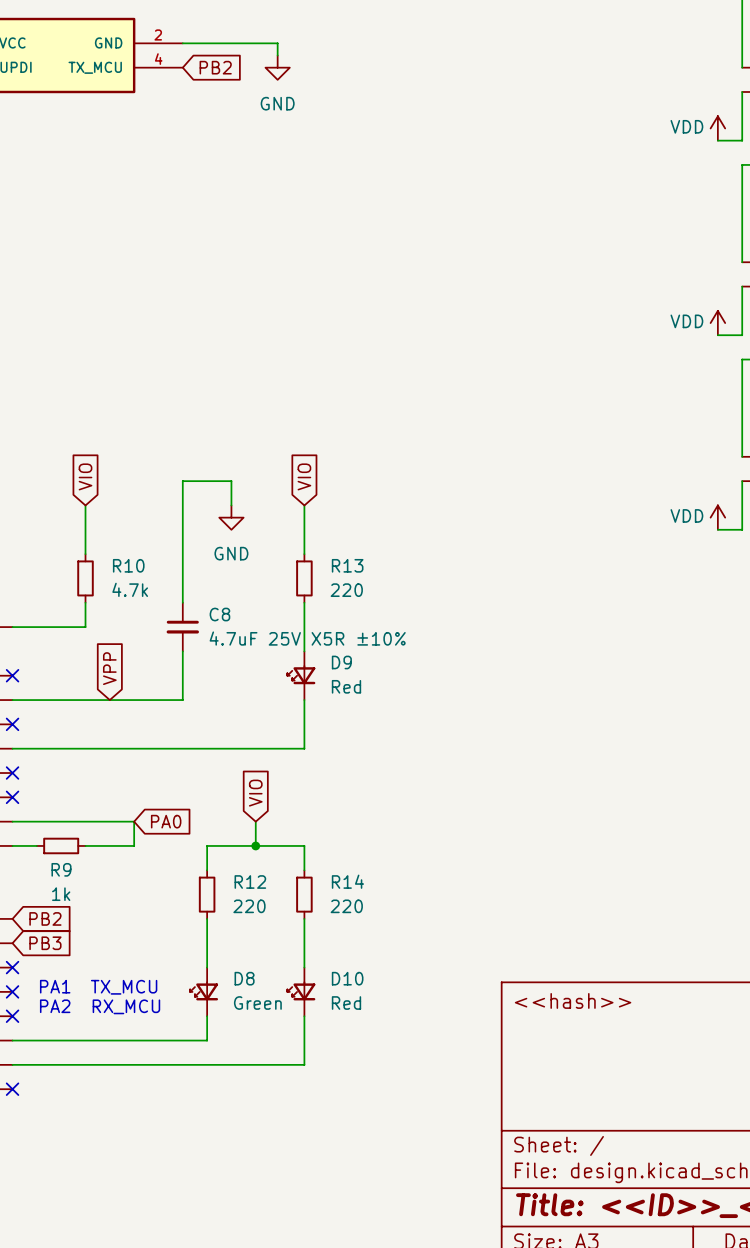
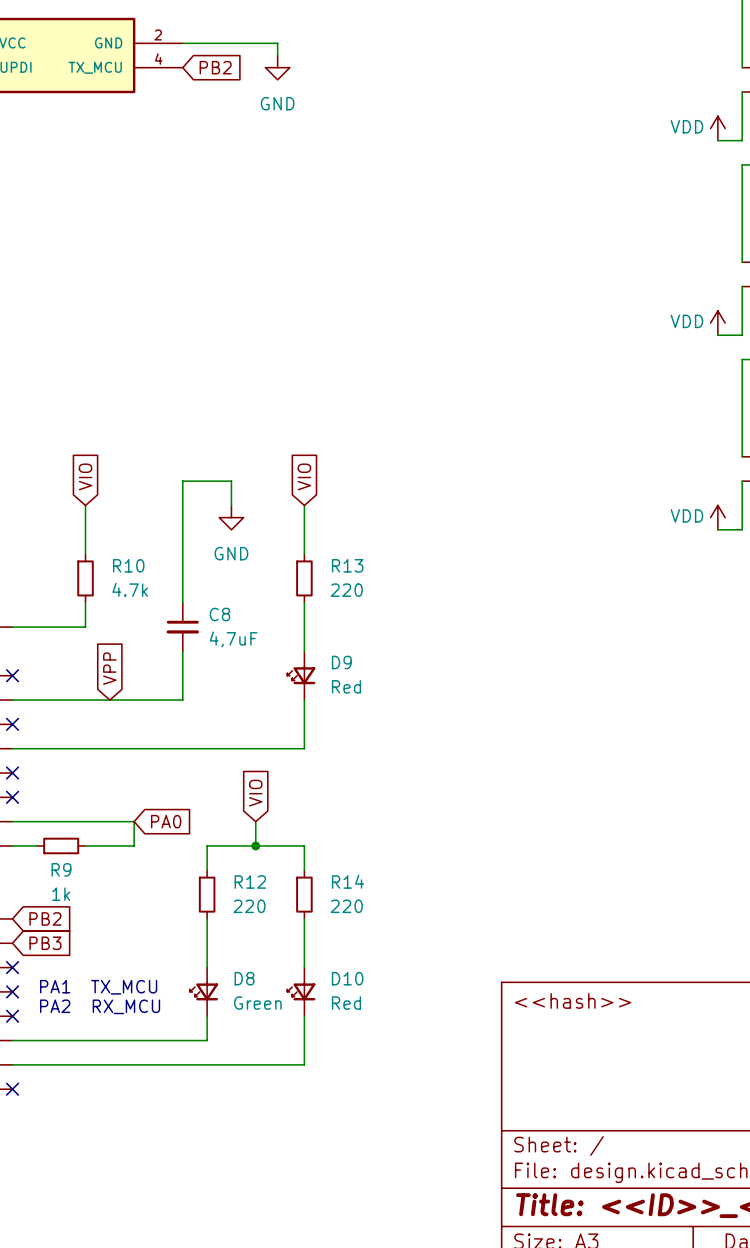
C8 value: 4.7uF 25V X5R ±10% (307, 638) -> 4,7uF (233, 639)

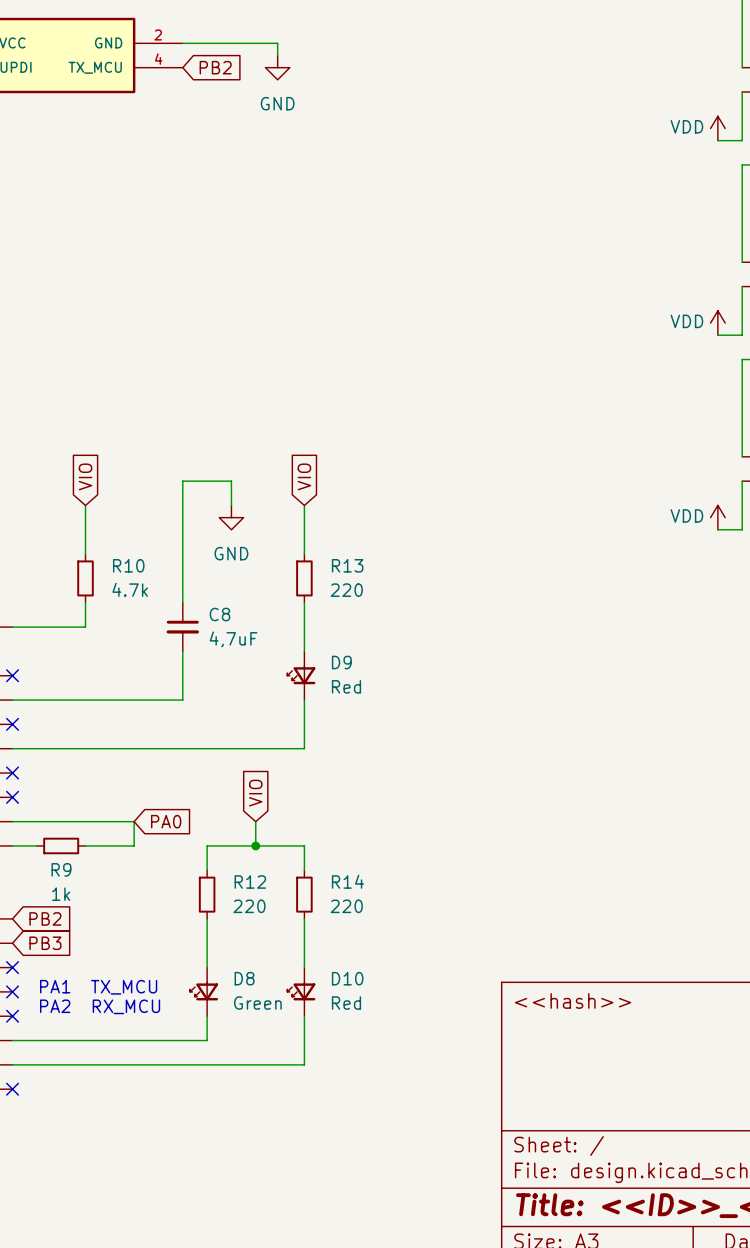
global label: VPP (109, 668) -> none

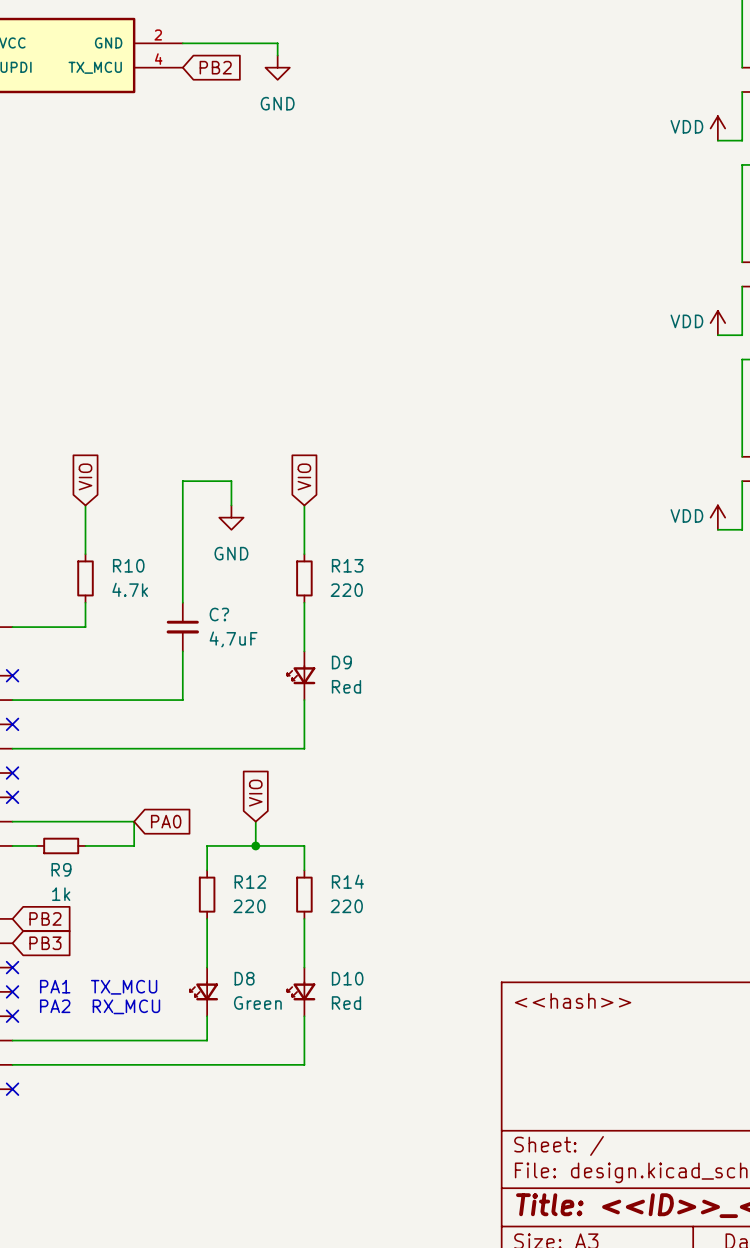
C8 name: C8 (219, 614) -> C? (219, 614)

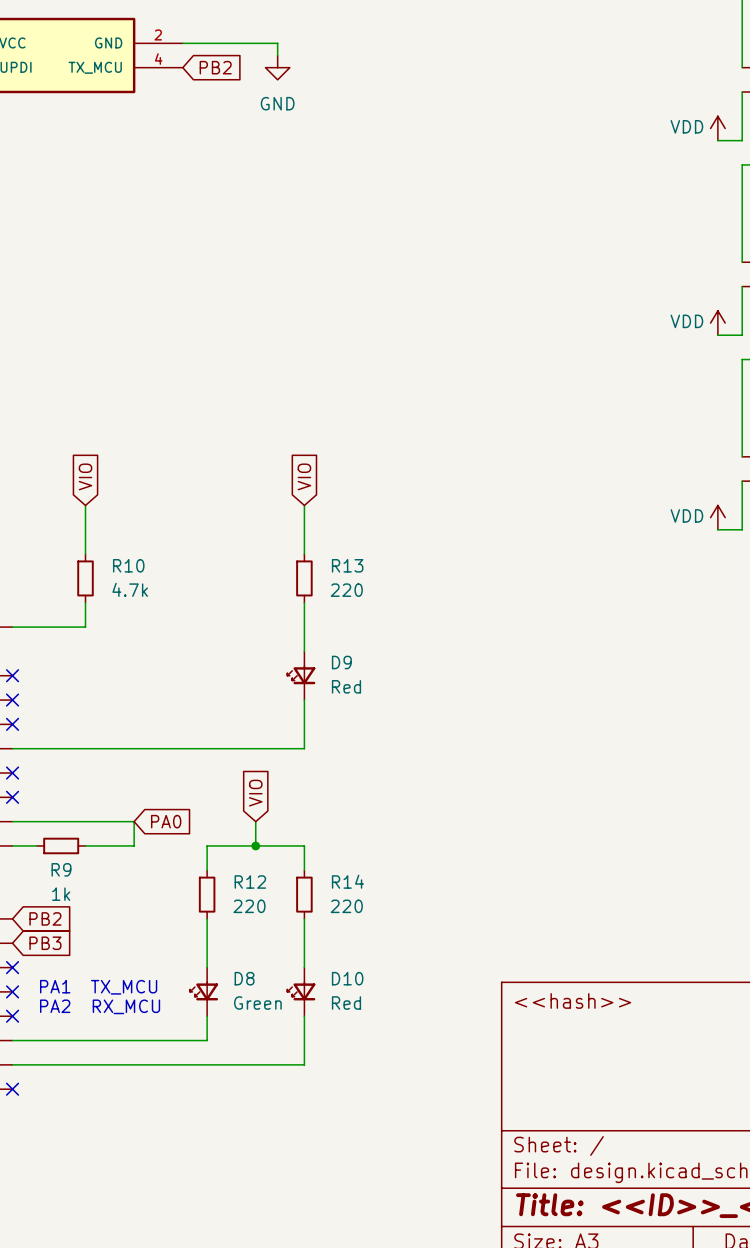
wire: (231, 505) (231, 481) (182, 481) (182, 602) -> none
power symbol: GND (231, 517) -> none
C?: 4,7uF (182, 627) -> none
wire: (182, 651) (182, 700) (12, 700) -> none
no-connect mark: none -> (12, 700)

